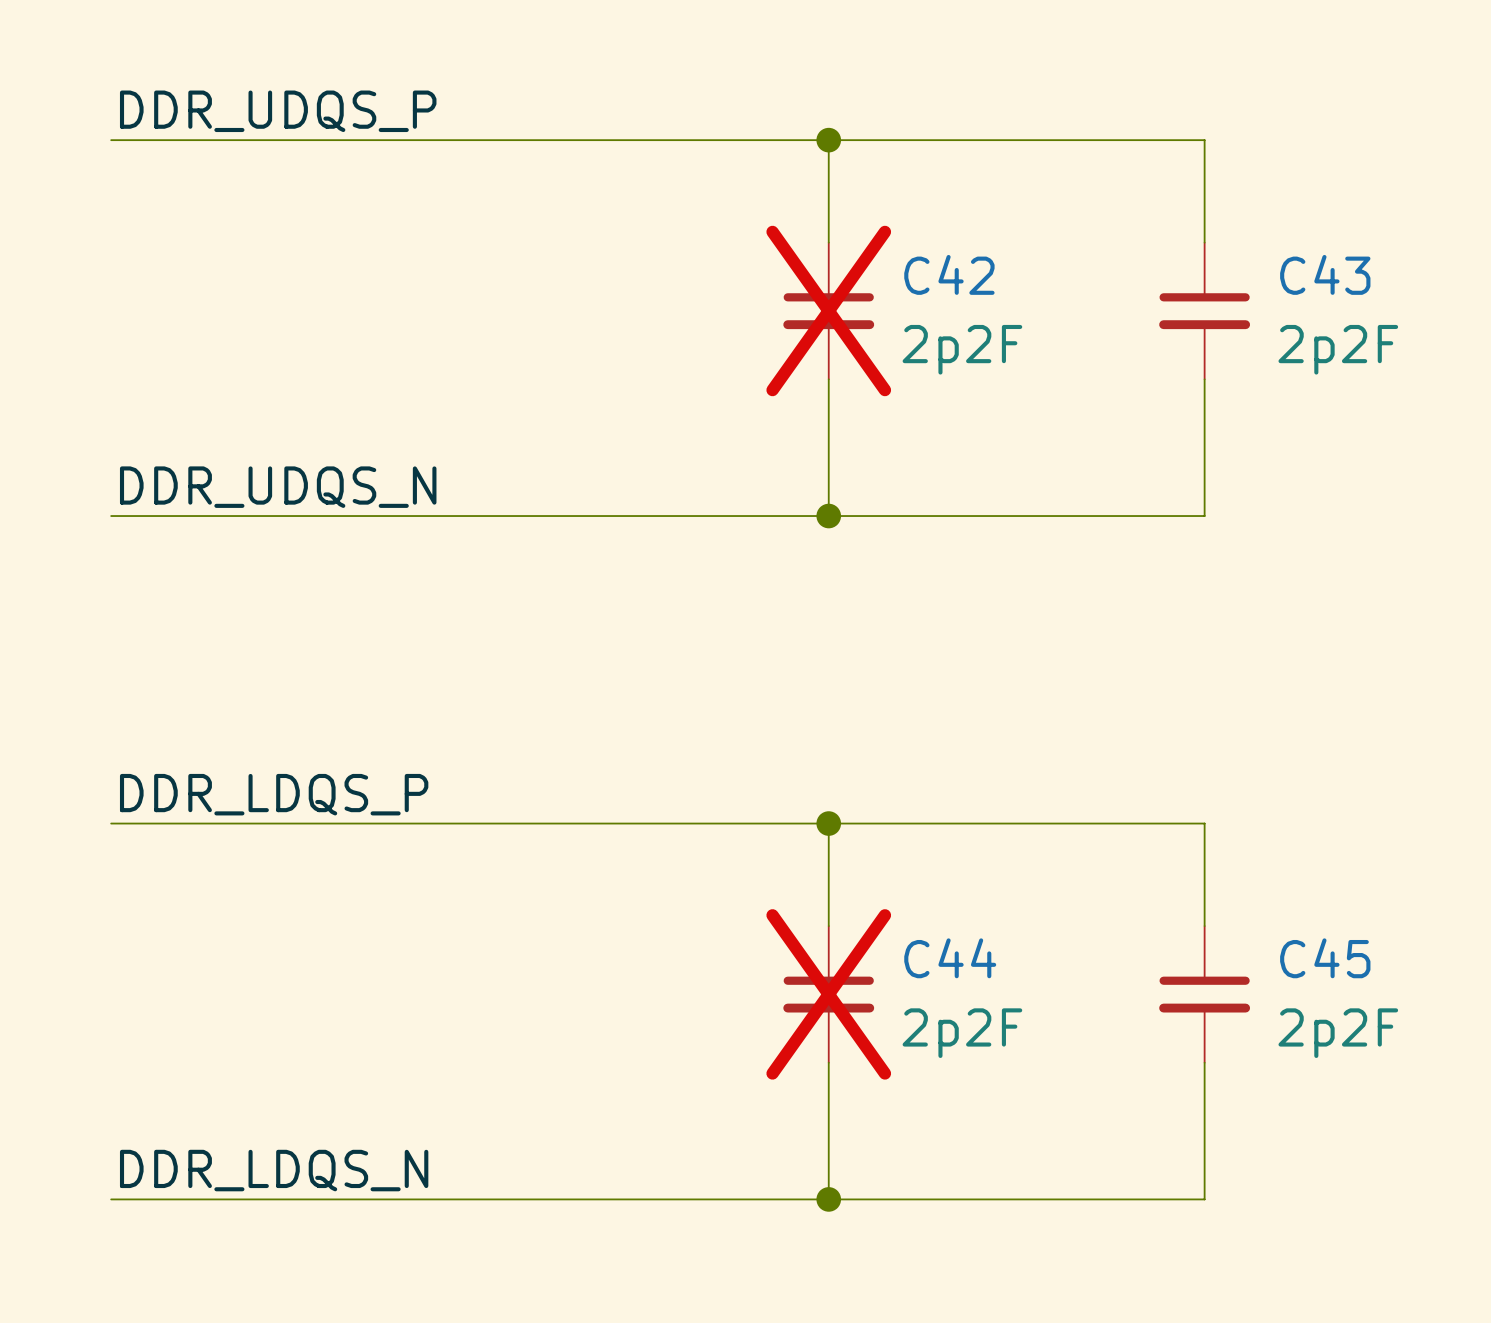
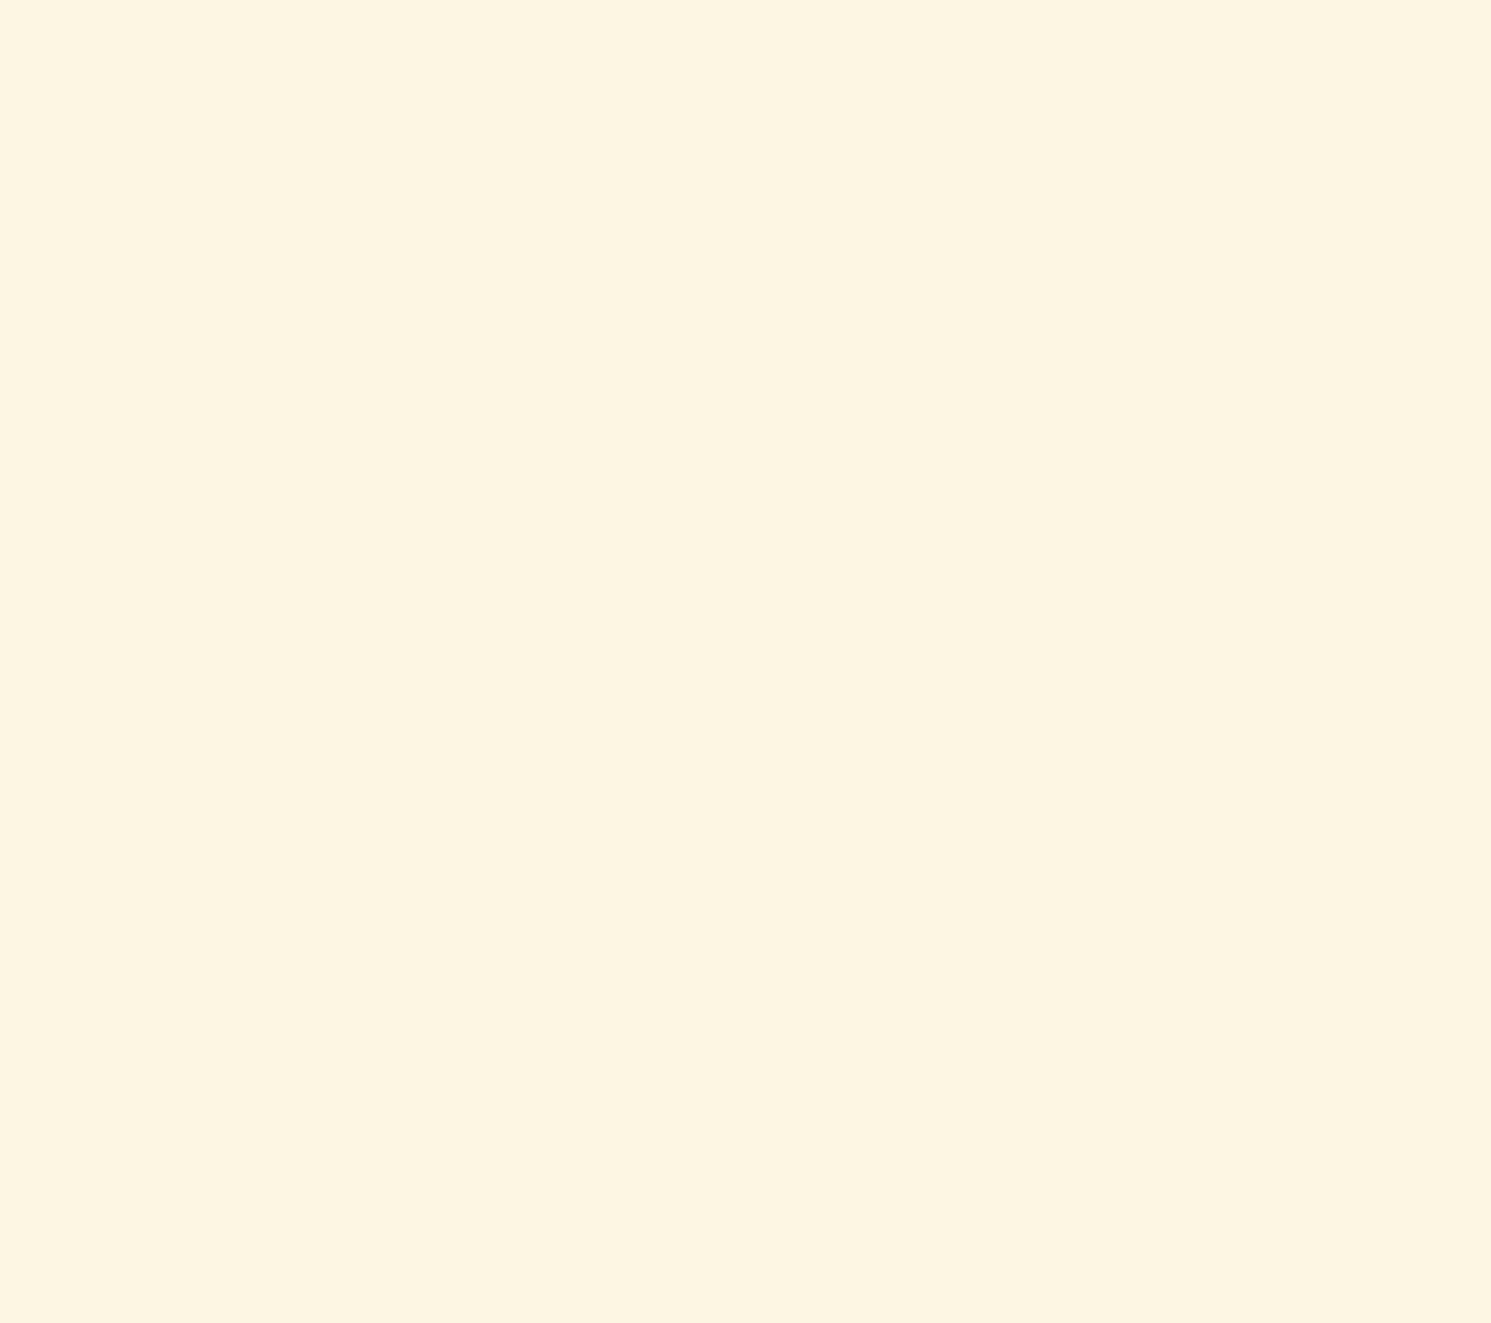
label: DDR_UDQS_P (278, 111) -> none
wire: (111, 140) (1204, 140) (1204, 242) -> none
wire: (828, 140) (828, 242) -> none
junction: (828, 140) -> none
C42: 2p2F (828, 311) -> none
C43: 2p2F (1204, 311) -> none
wire: (828, 379) (828, 516) -> none
wire: (1204, 379) (1204, 516) (111, 516) -> none
label: DDR_UDQS_N (278, 487) -> none
junction: (828, 516) -> none
label: DDR_LDQS_P (274, 794) -> none
wire: (111, 823) (1204, 823) (1204, 926) -> none
wire: (828, 823) (828, 926) -> none
junction: (828, 823) -> none
C44: 2p2F (828, 994) -> none
C45: 2p2F (1204, 994) -> none
wire: (828, 1062) (828, 1199) -> none
wire: (1204, 1062) (1204, 1199) (111, 1199) -> none
label: DDR_LDQS_N (274, 1170) -> none
junction: (828, 1199) -> none

